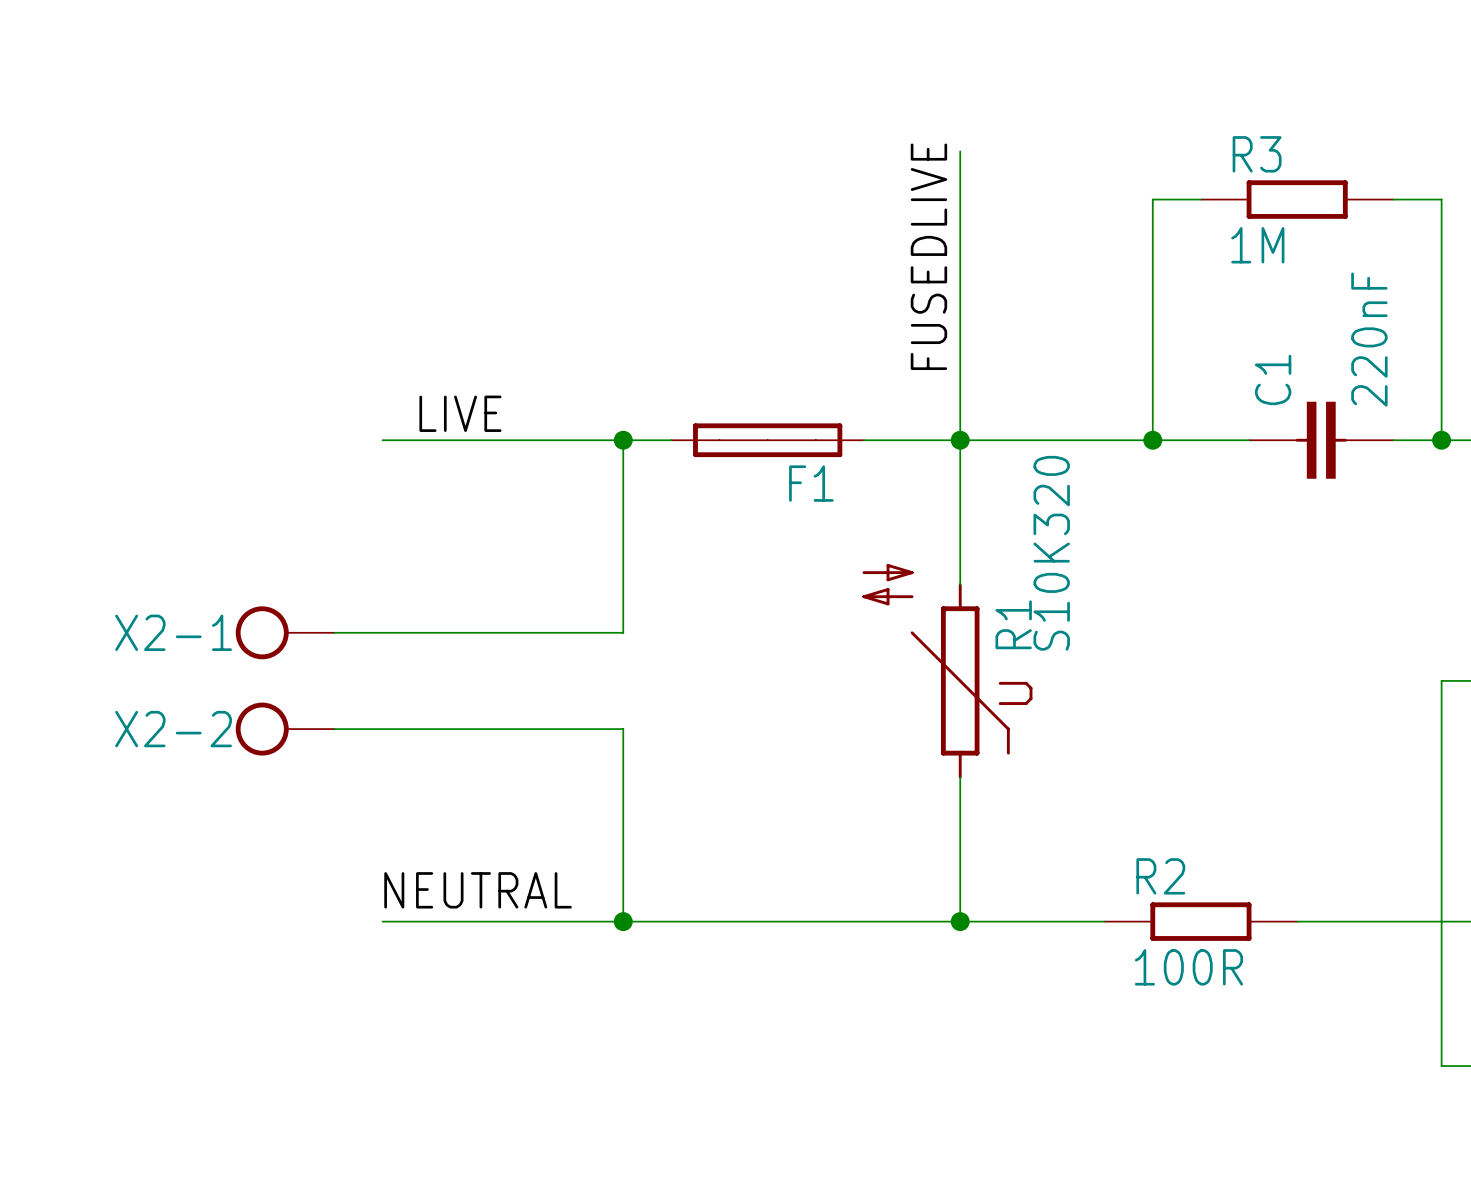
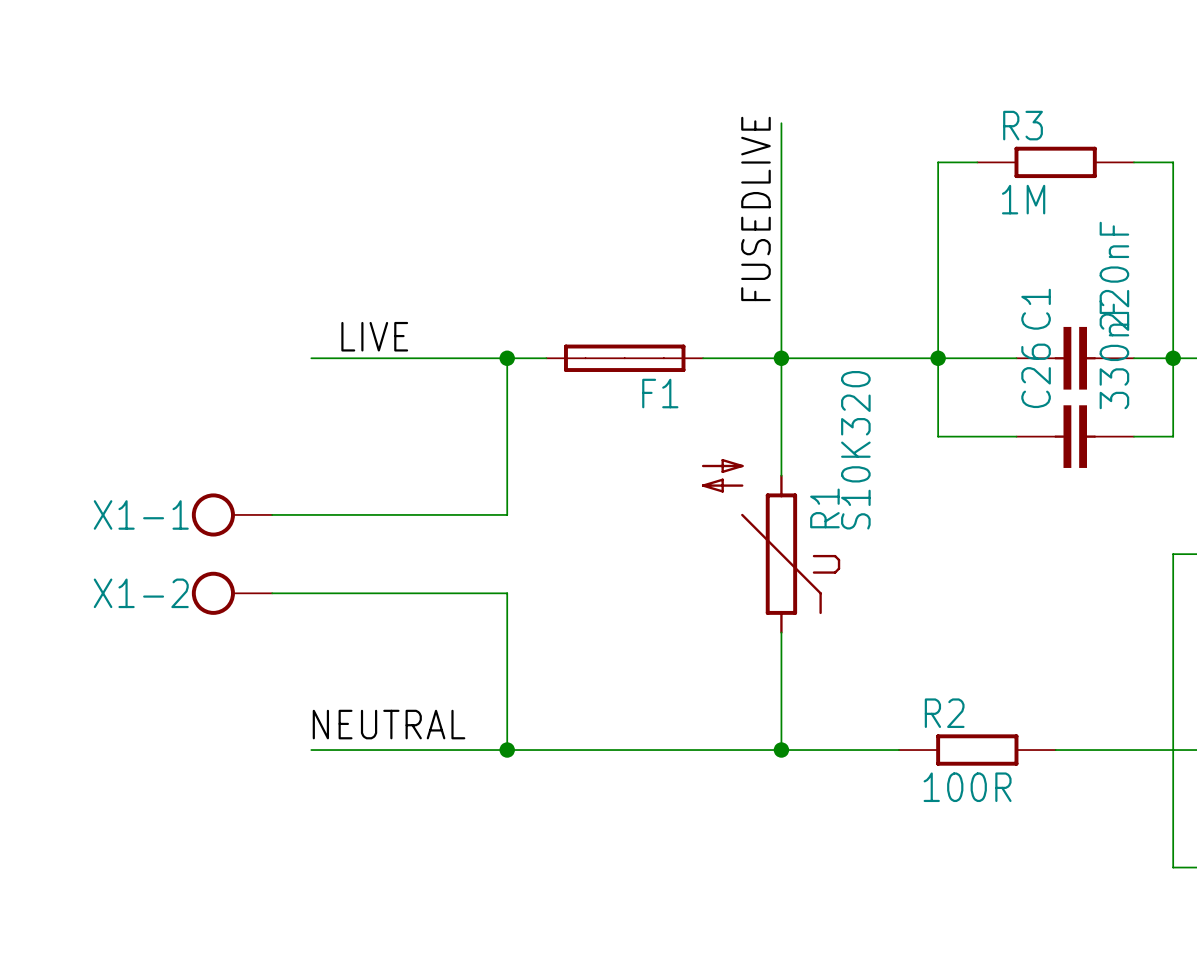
wire: none -> (938, 358) (938, 436) (1016, 436)
wire: none -> (1173, 358) (1173, 436) (1134, 436)
C26: none -> 330nF (1075, 436)
X2-1 name: X2-1 (173, 632) -> X1-1 (141, 514)
X2-2 name: X2-2 (173, 729) -> X1-2 (141, 593)

